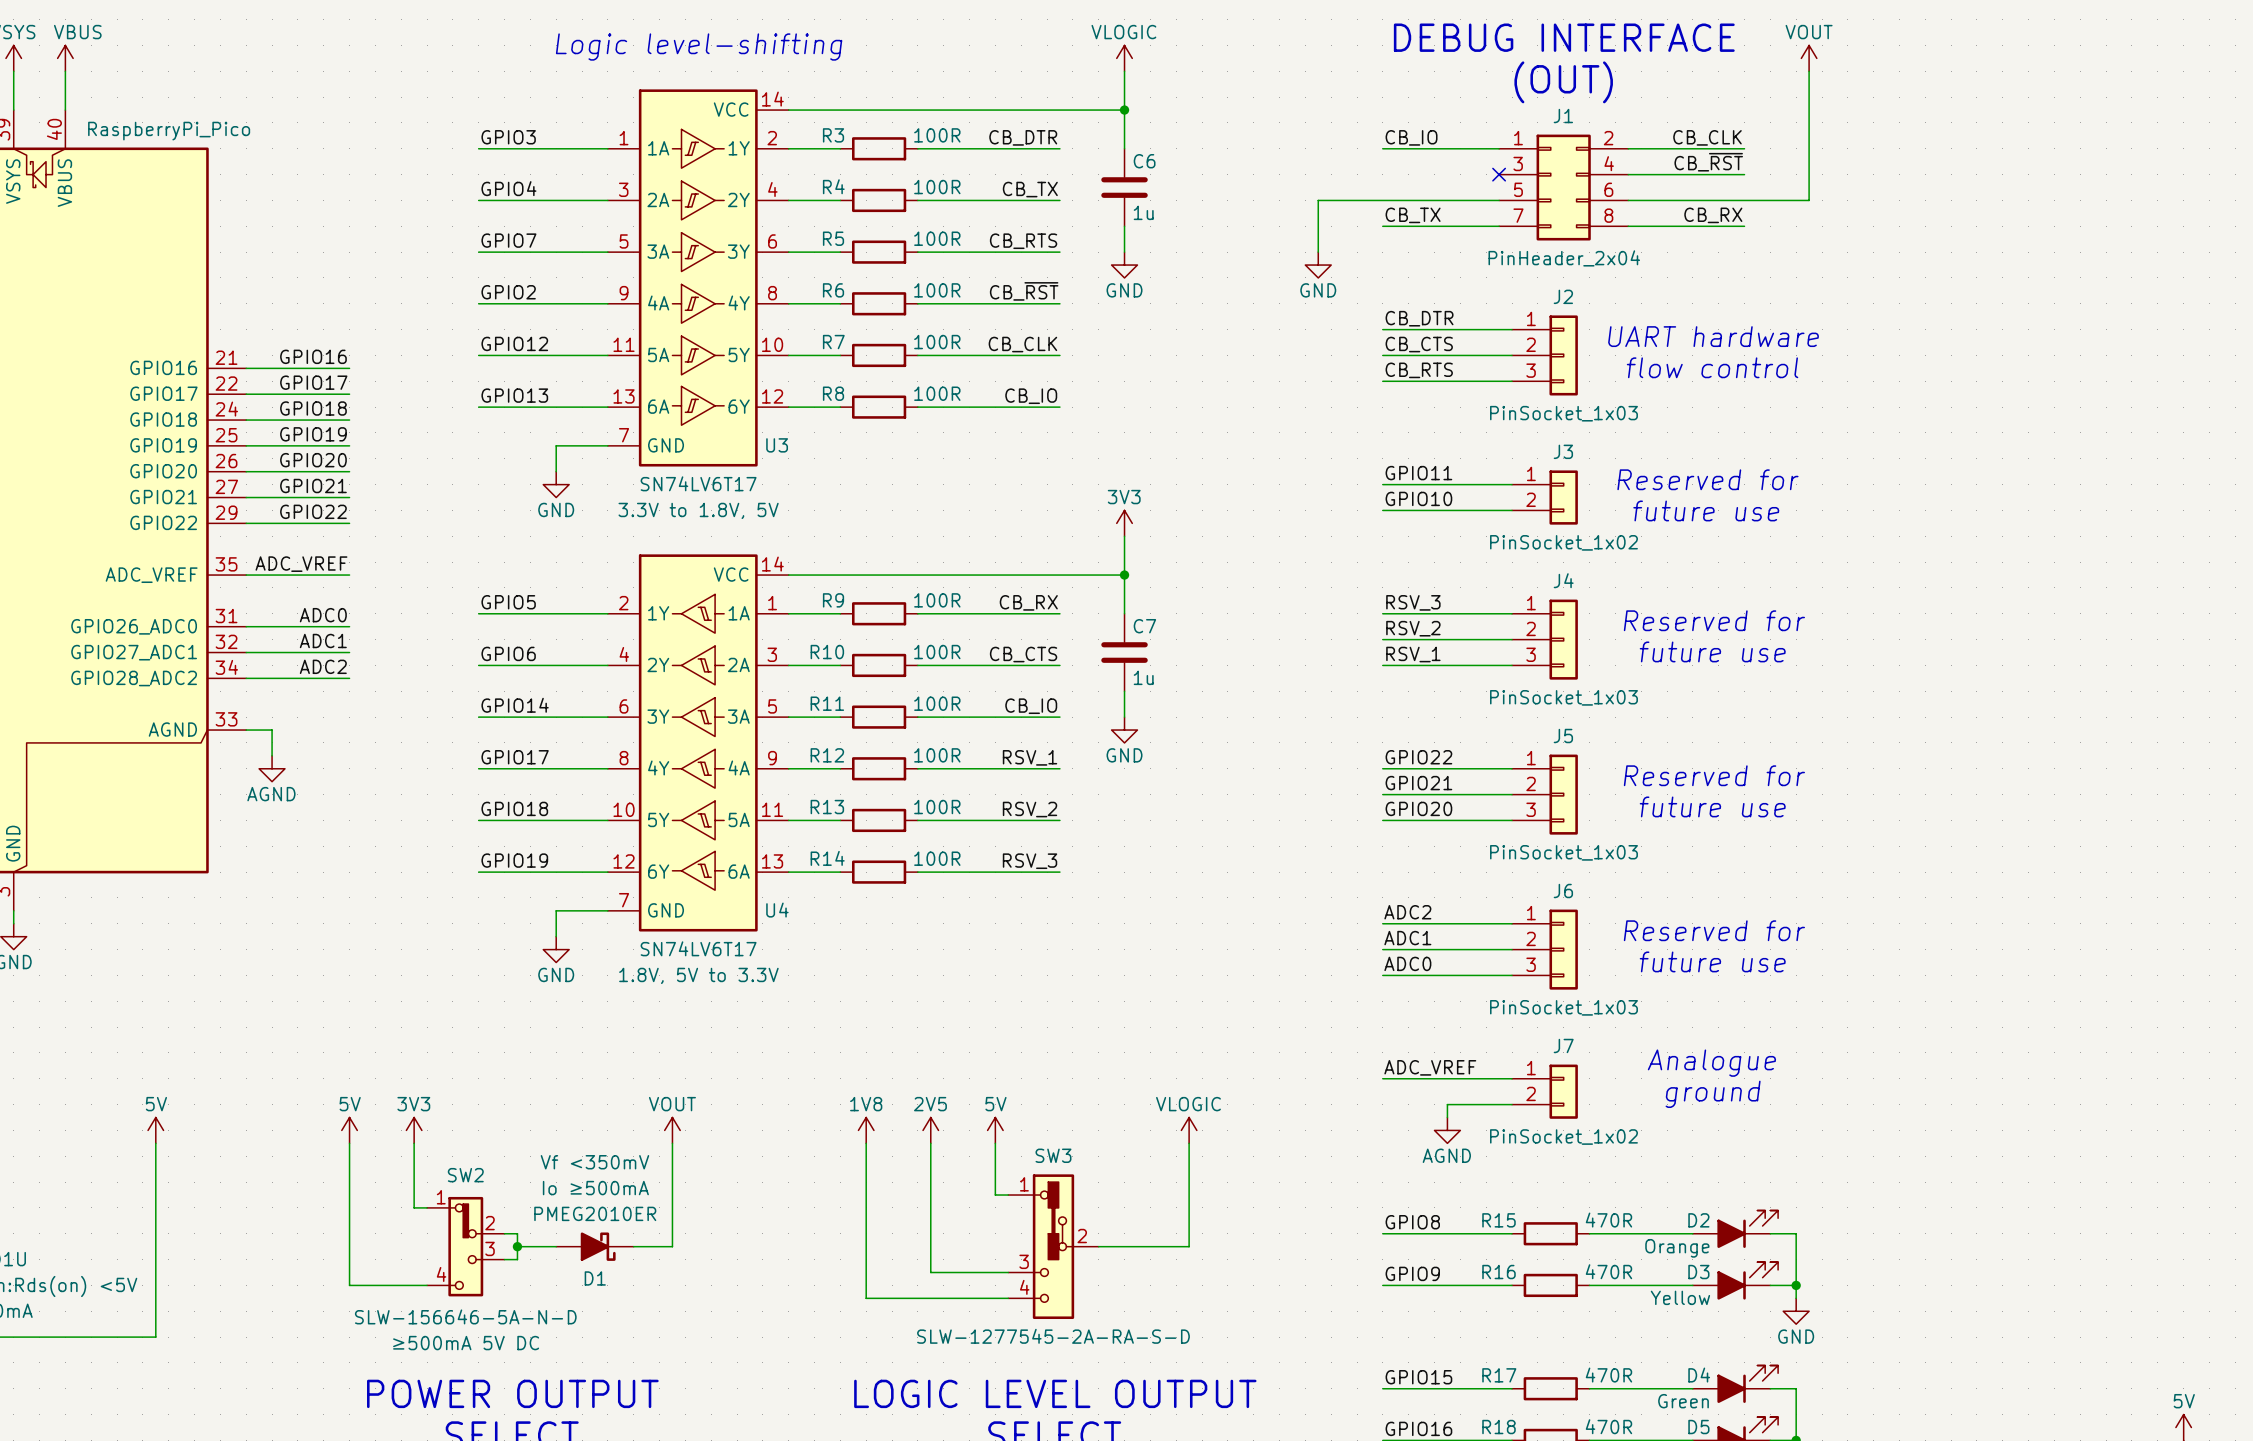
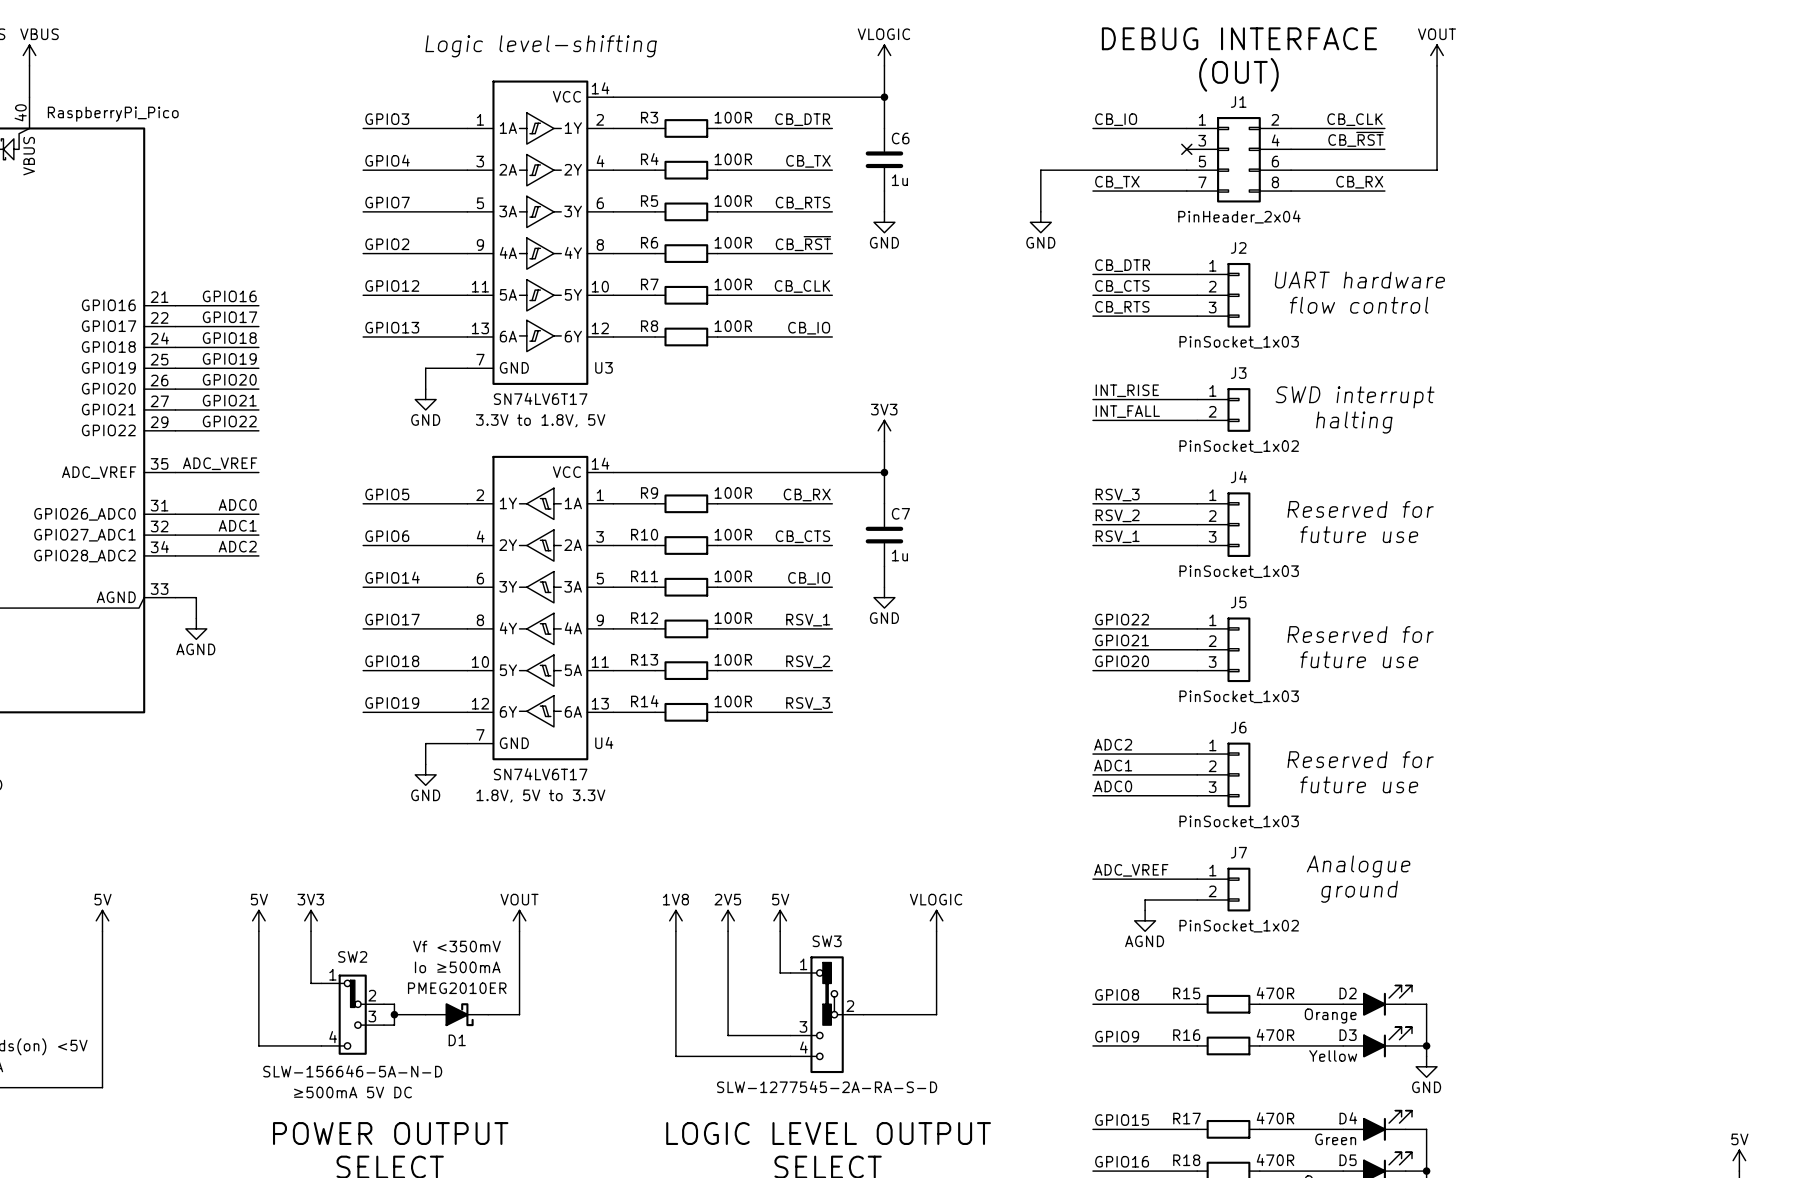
label: GPIO11 (1418, 473) -> INT_RISE (1127, 390)
text: Reserved for (1707, 479) -> none
text: none -> SWD interrupt (1355, 397)
label: GPIO10 (1418, 498) -> INT_FALL (1127, 411)
text: future use (1706, 510) -> none
text: none -> halting (1354, 422)

